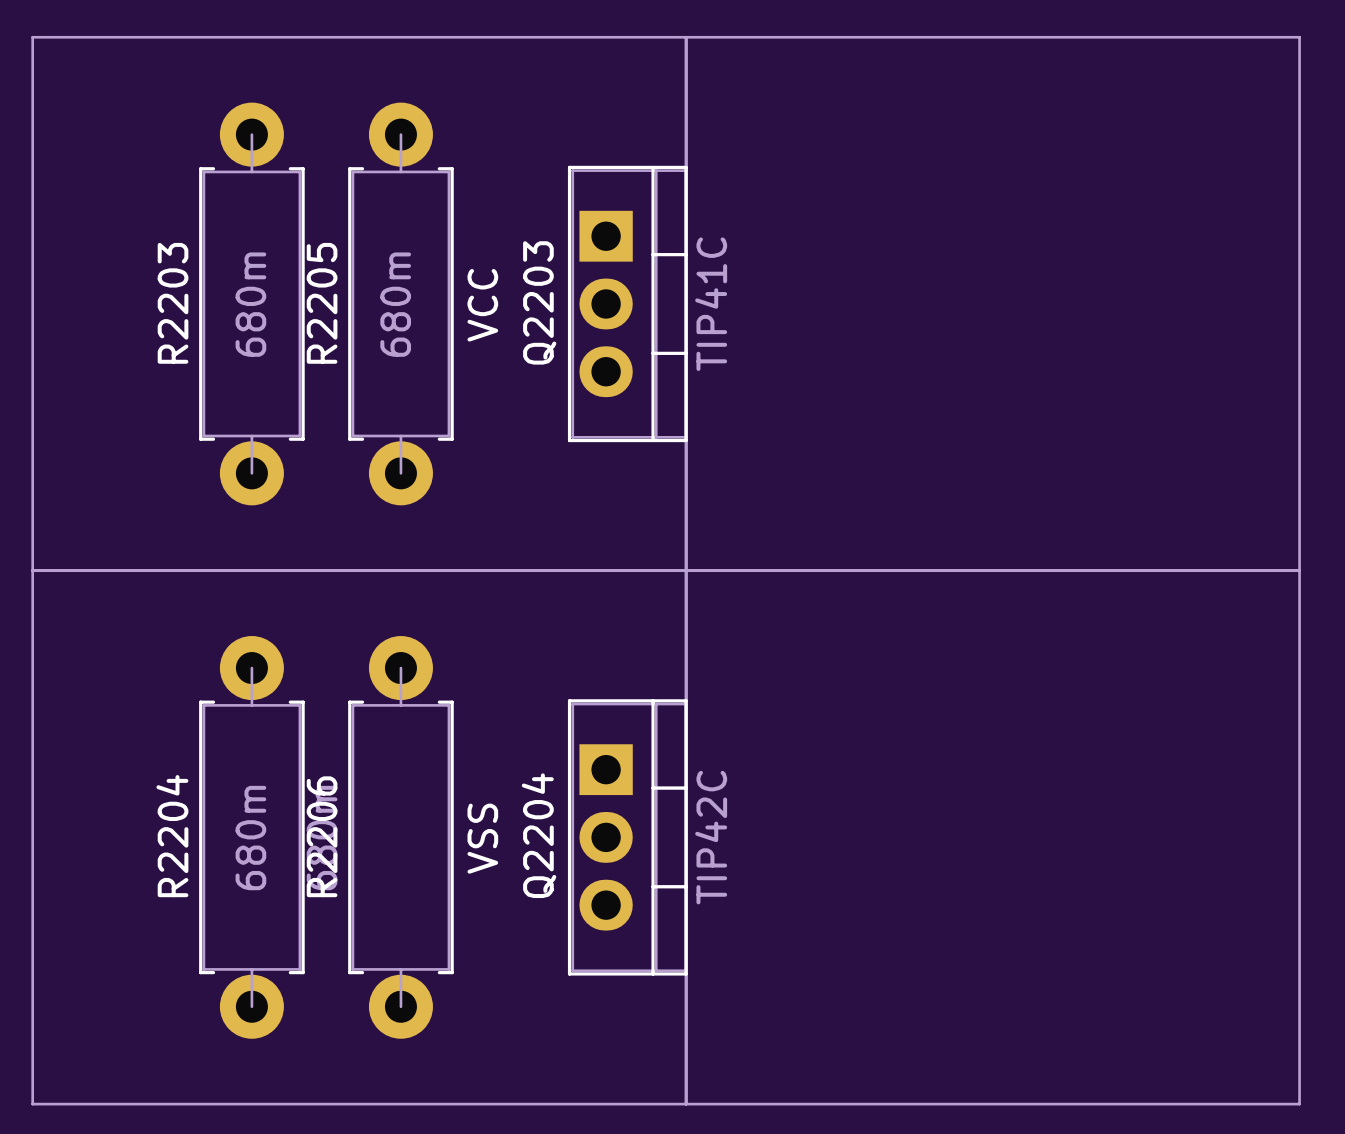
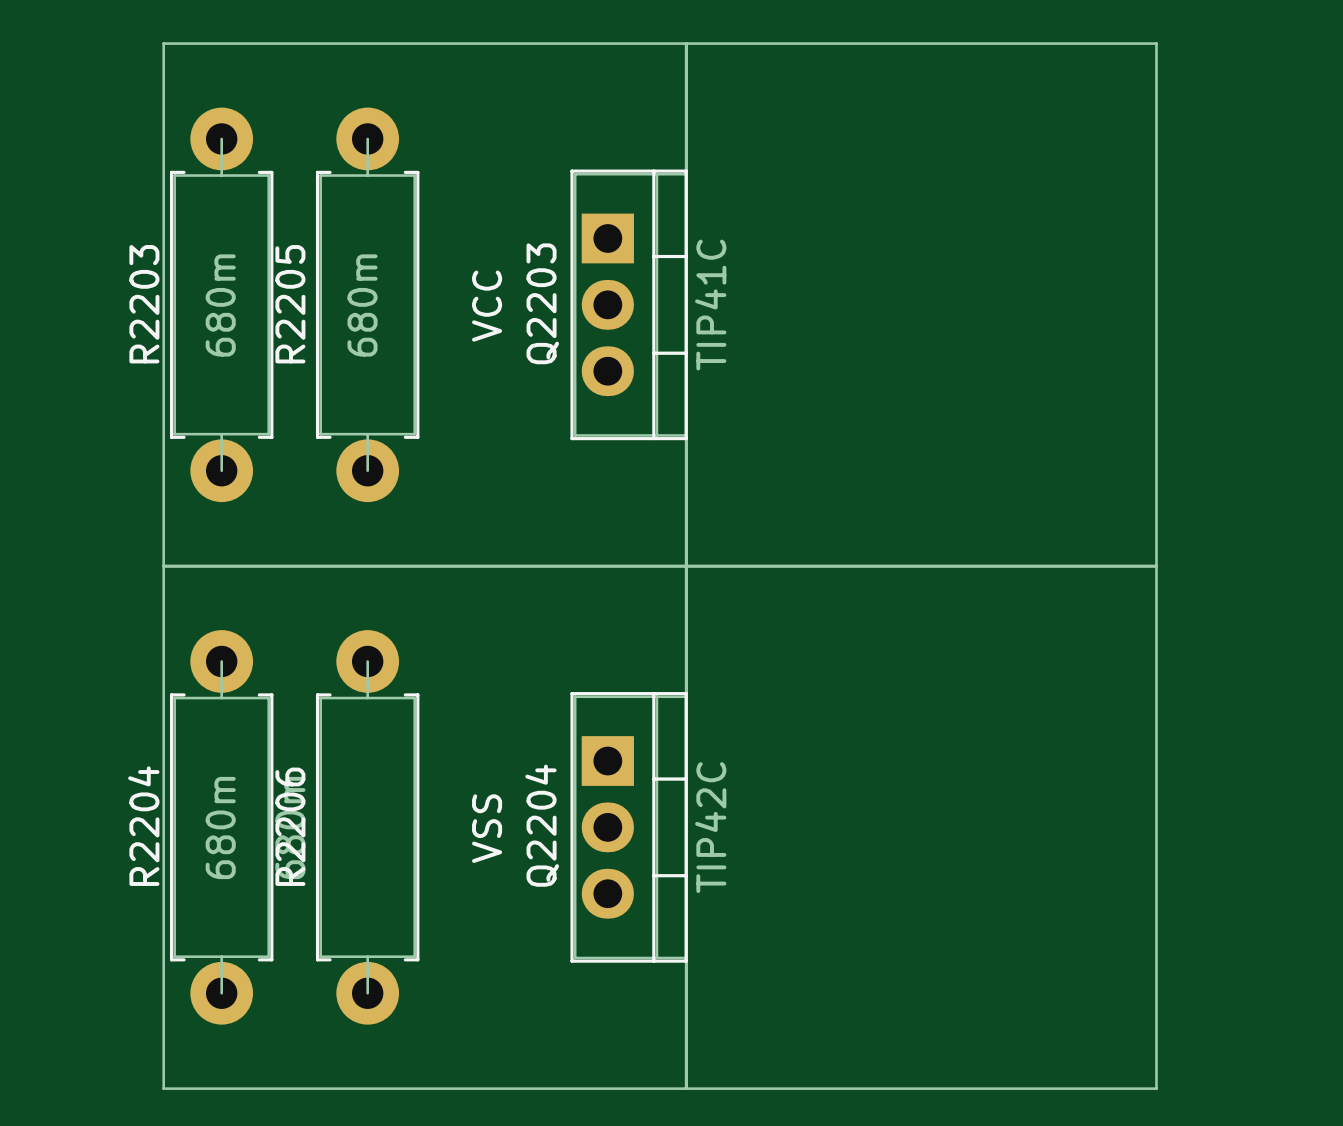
line: (152, 37) (32, 37) (32, 1104) (152, 1104) -> (163, 43) (163, 1088)
line: (1166, 37) (1299, 37) (1299, 1104) (1166, 1104) -> (1156, 43) (1156, 1088)
R2203 position: (251, 303) -> (221, 304)
R2205 position: (400, 303) -> (367, 304)
line: (32, 570) (152, 570) -> none
line: (1166, 570) (1299, 570) -> none
R2204 position: (251, 837) -> (221, 827)
R2206 position: (400, 837) -> (367, 827)

